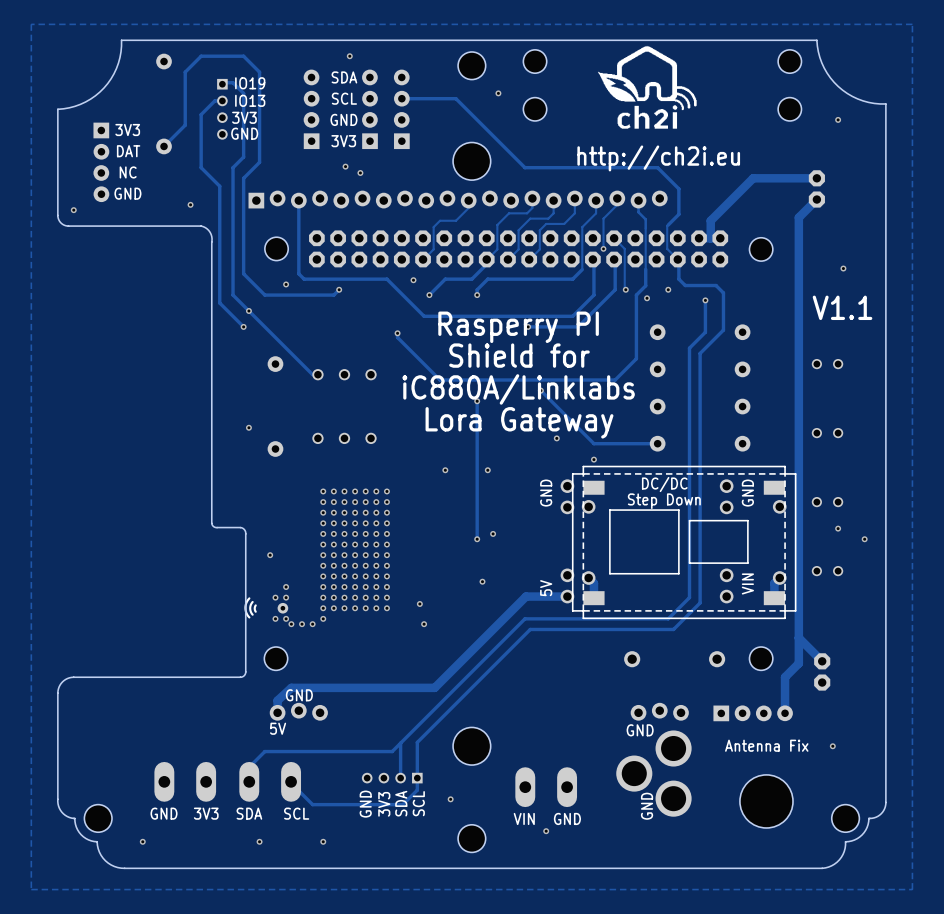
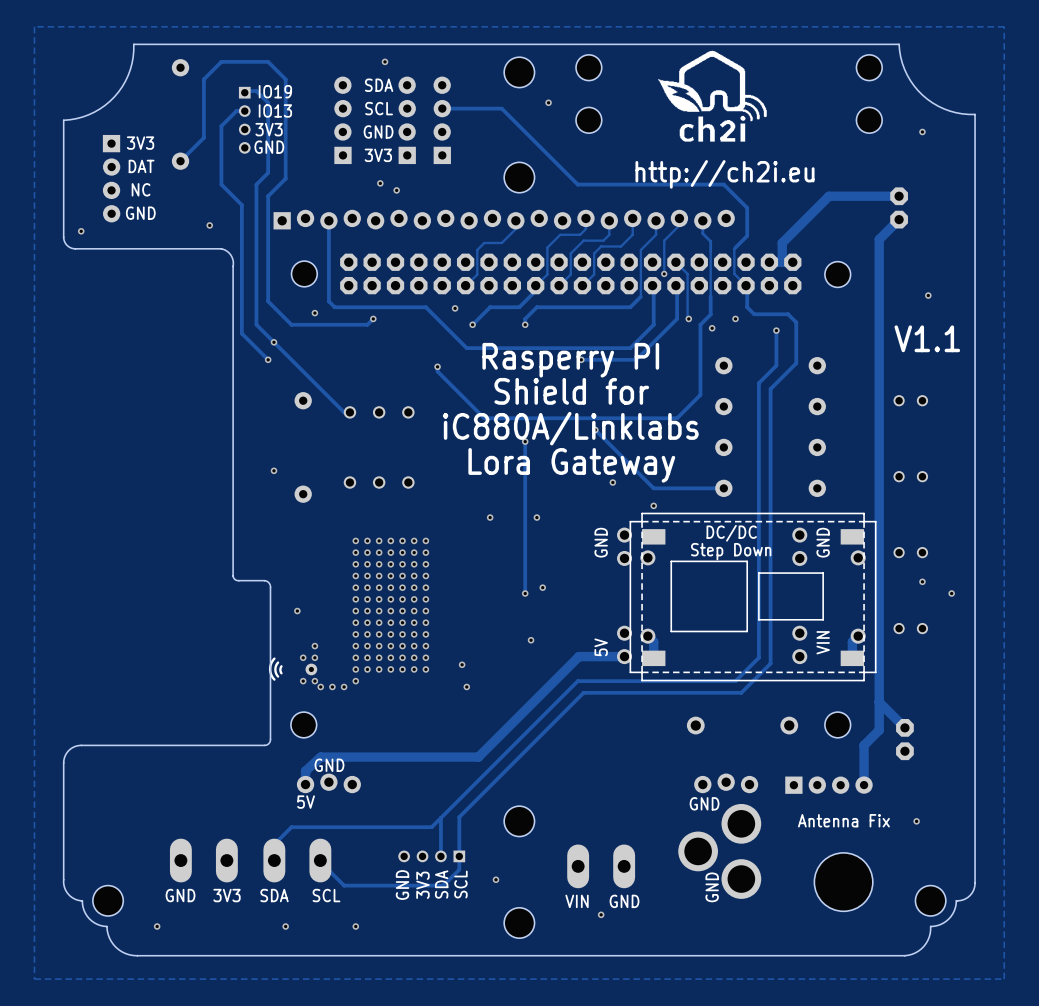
hole: (471, 161) -> none
part: none -> (519, 177)
hole: (471, 746) -> none
part: none -> (519, 821)

